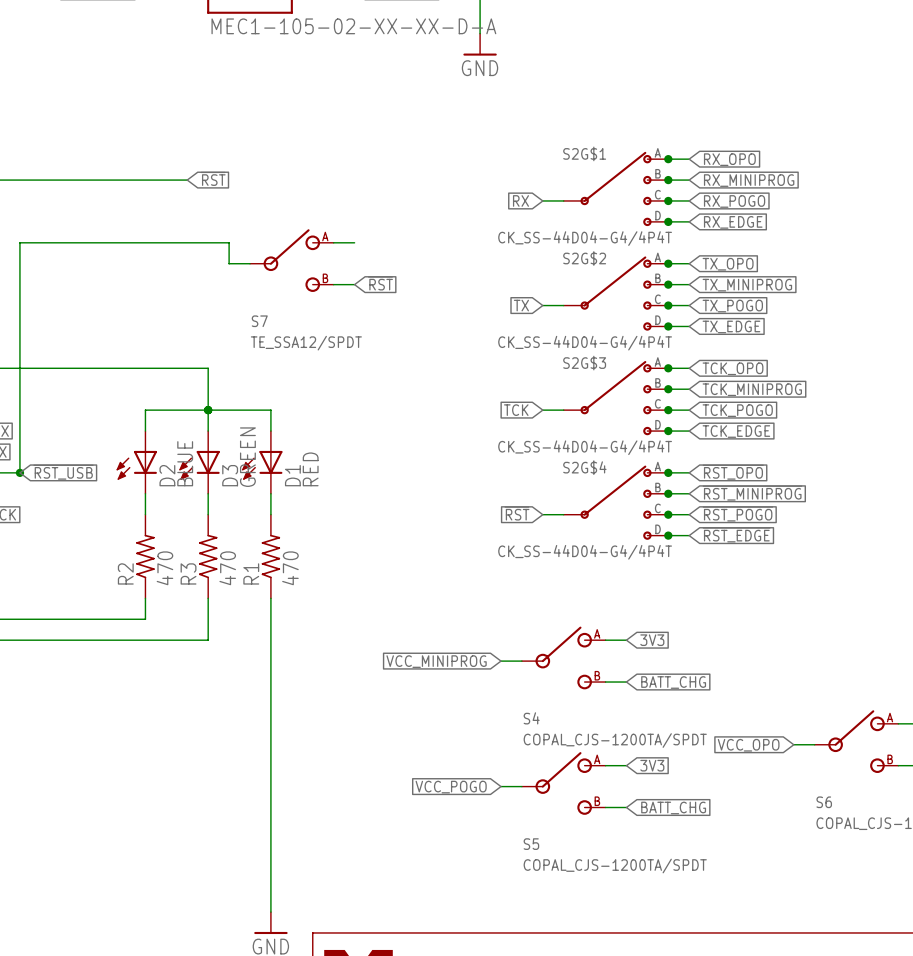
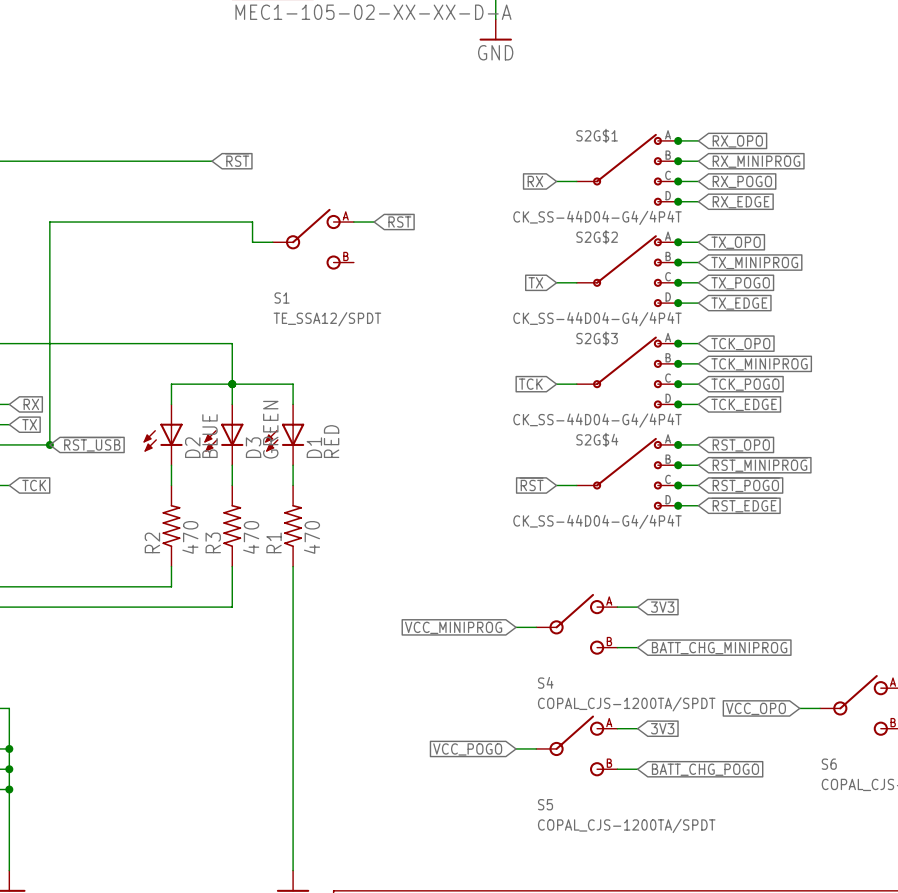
global label position: ~{RST} (380, 283) -> ~{RST} (399, 220)
wire: (333, 284) (354, 284) -> none
S7 name: S7 (259, 321) -> S1 (282, 298)
global label: BATT_CHG (673, 682) -> BATT_CHG_MINIPROG (719, 648)
global label: BATT_CHG (673, 808) -> BATT_CHG_POGO (705, 769)

